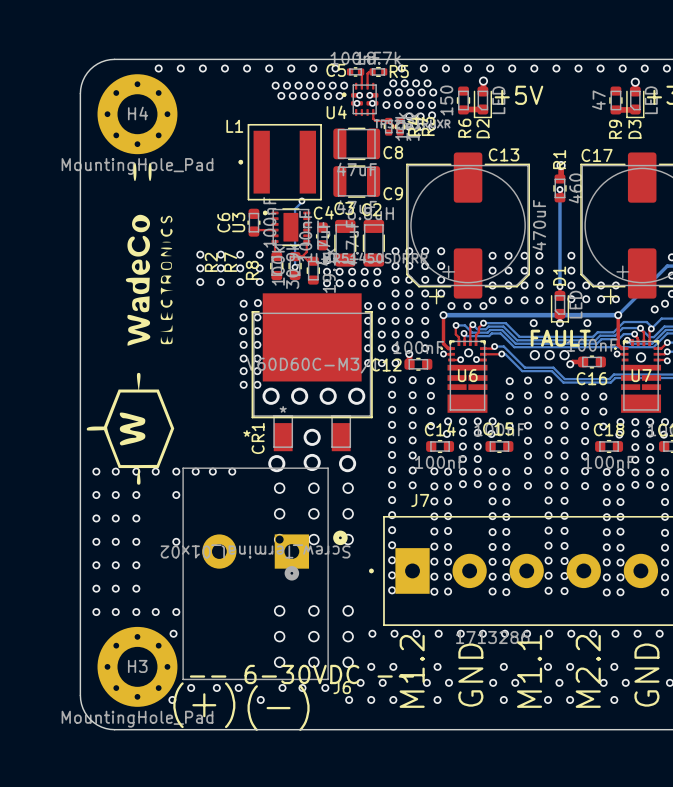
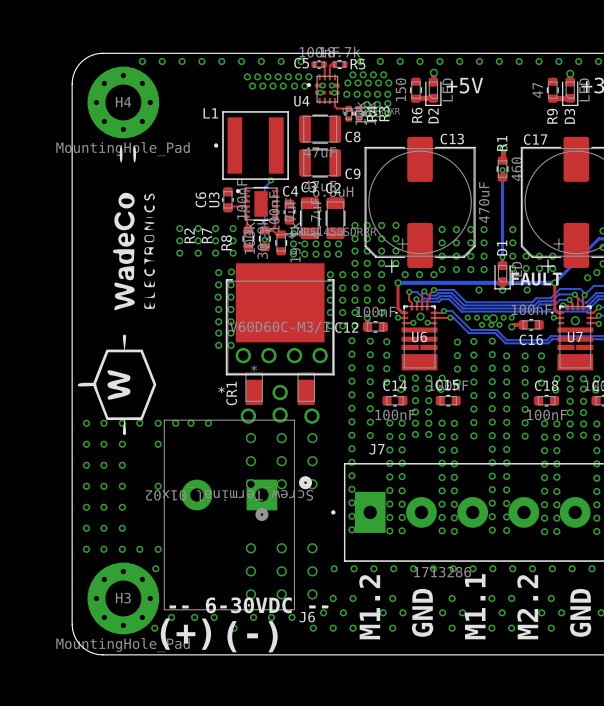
text position: FAULT (560, 338) -> FAULT (536, 279)
via: none -> (467, 317)
via: none -> (476, 317)
via: none -> (486, 317)
via: none -> (503, 317)
via: none -> (511, 317)
via: (534, 355) -> none
via: (564, 355) -> none
via: none -> (482, 324)
via: none -> (491, 324)
via: none -> (499, 324)

